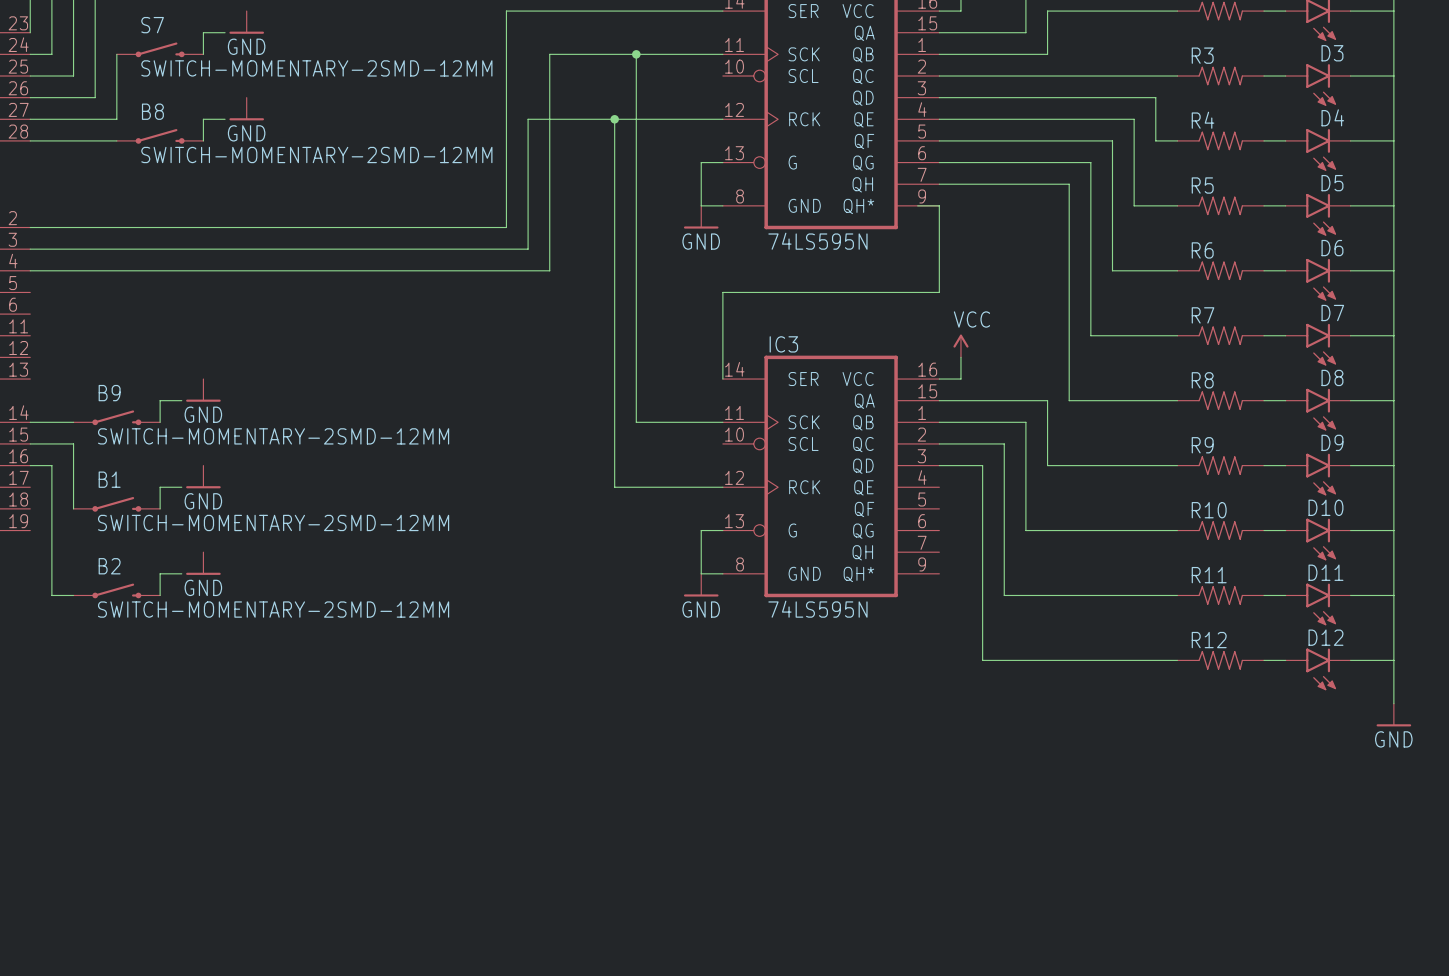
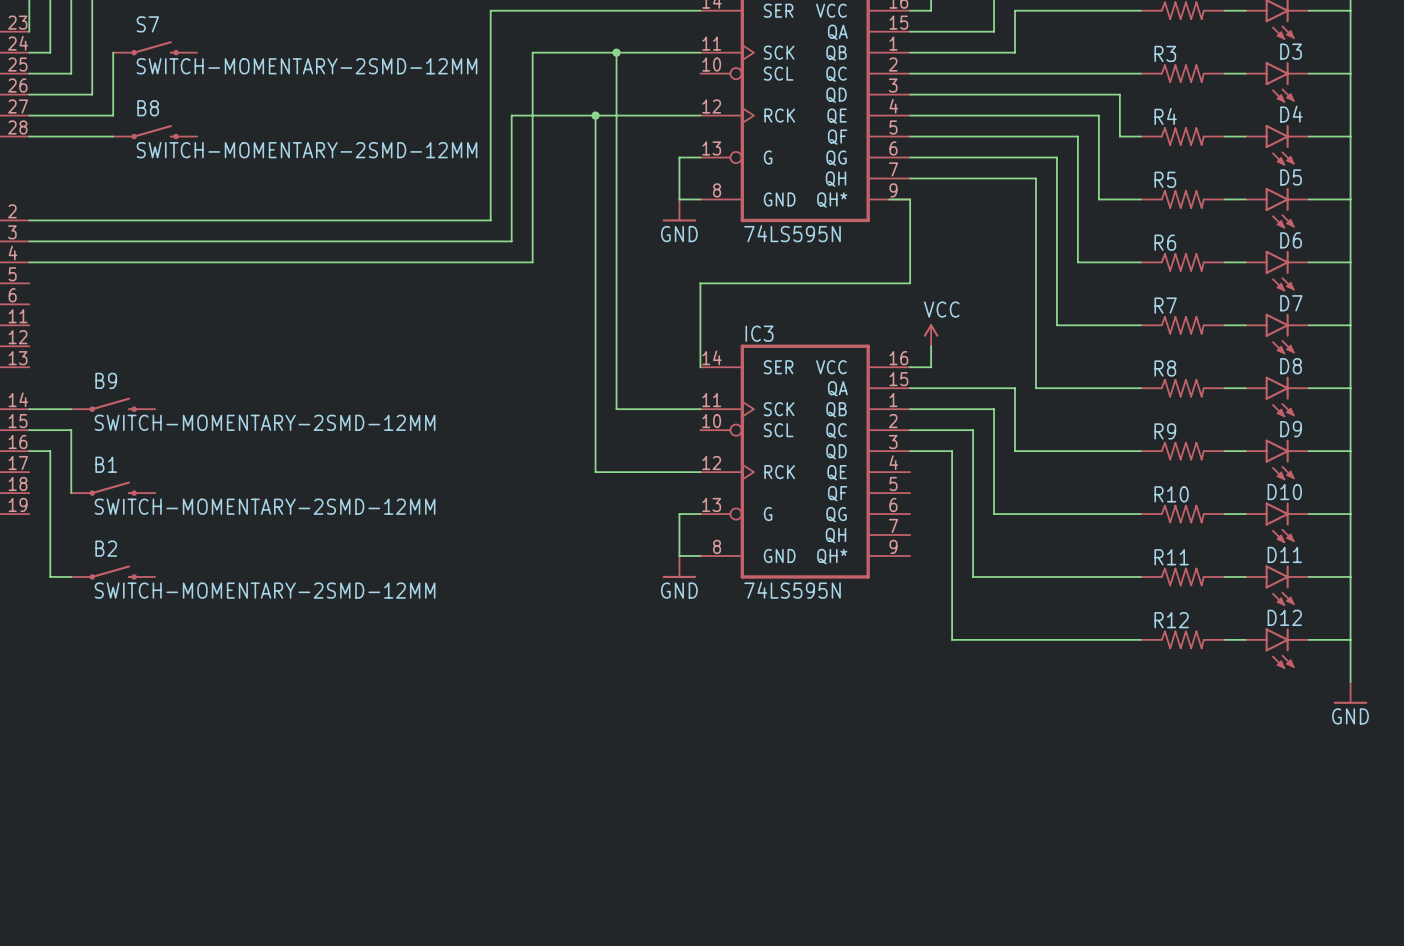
power symbol: GND (246, 22) -> none
wire: (225, 32) (203, 32) (203, 54) -> none
power symbol: GND (246, 109) -> none
wire: (225, 119) (203, 119) (203, 140) -> none
power symbol: GND (203, 390) -> none
wire: (181, 400) (160, 400) (160, 422) -> none
power symbol: GND (203, 476) -> none
wire: (181, 487) (160, 487) (160, 508) -> none
power symbol: GND (203, 563) -> none
wire: (181, 573) (160, 573) (160, 595) -> none

